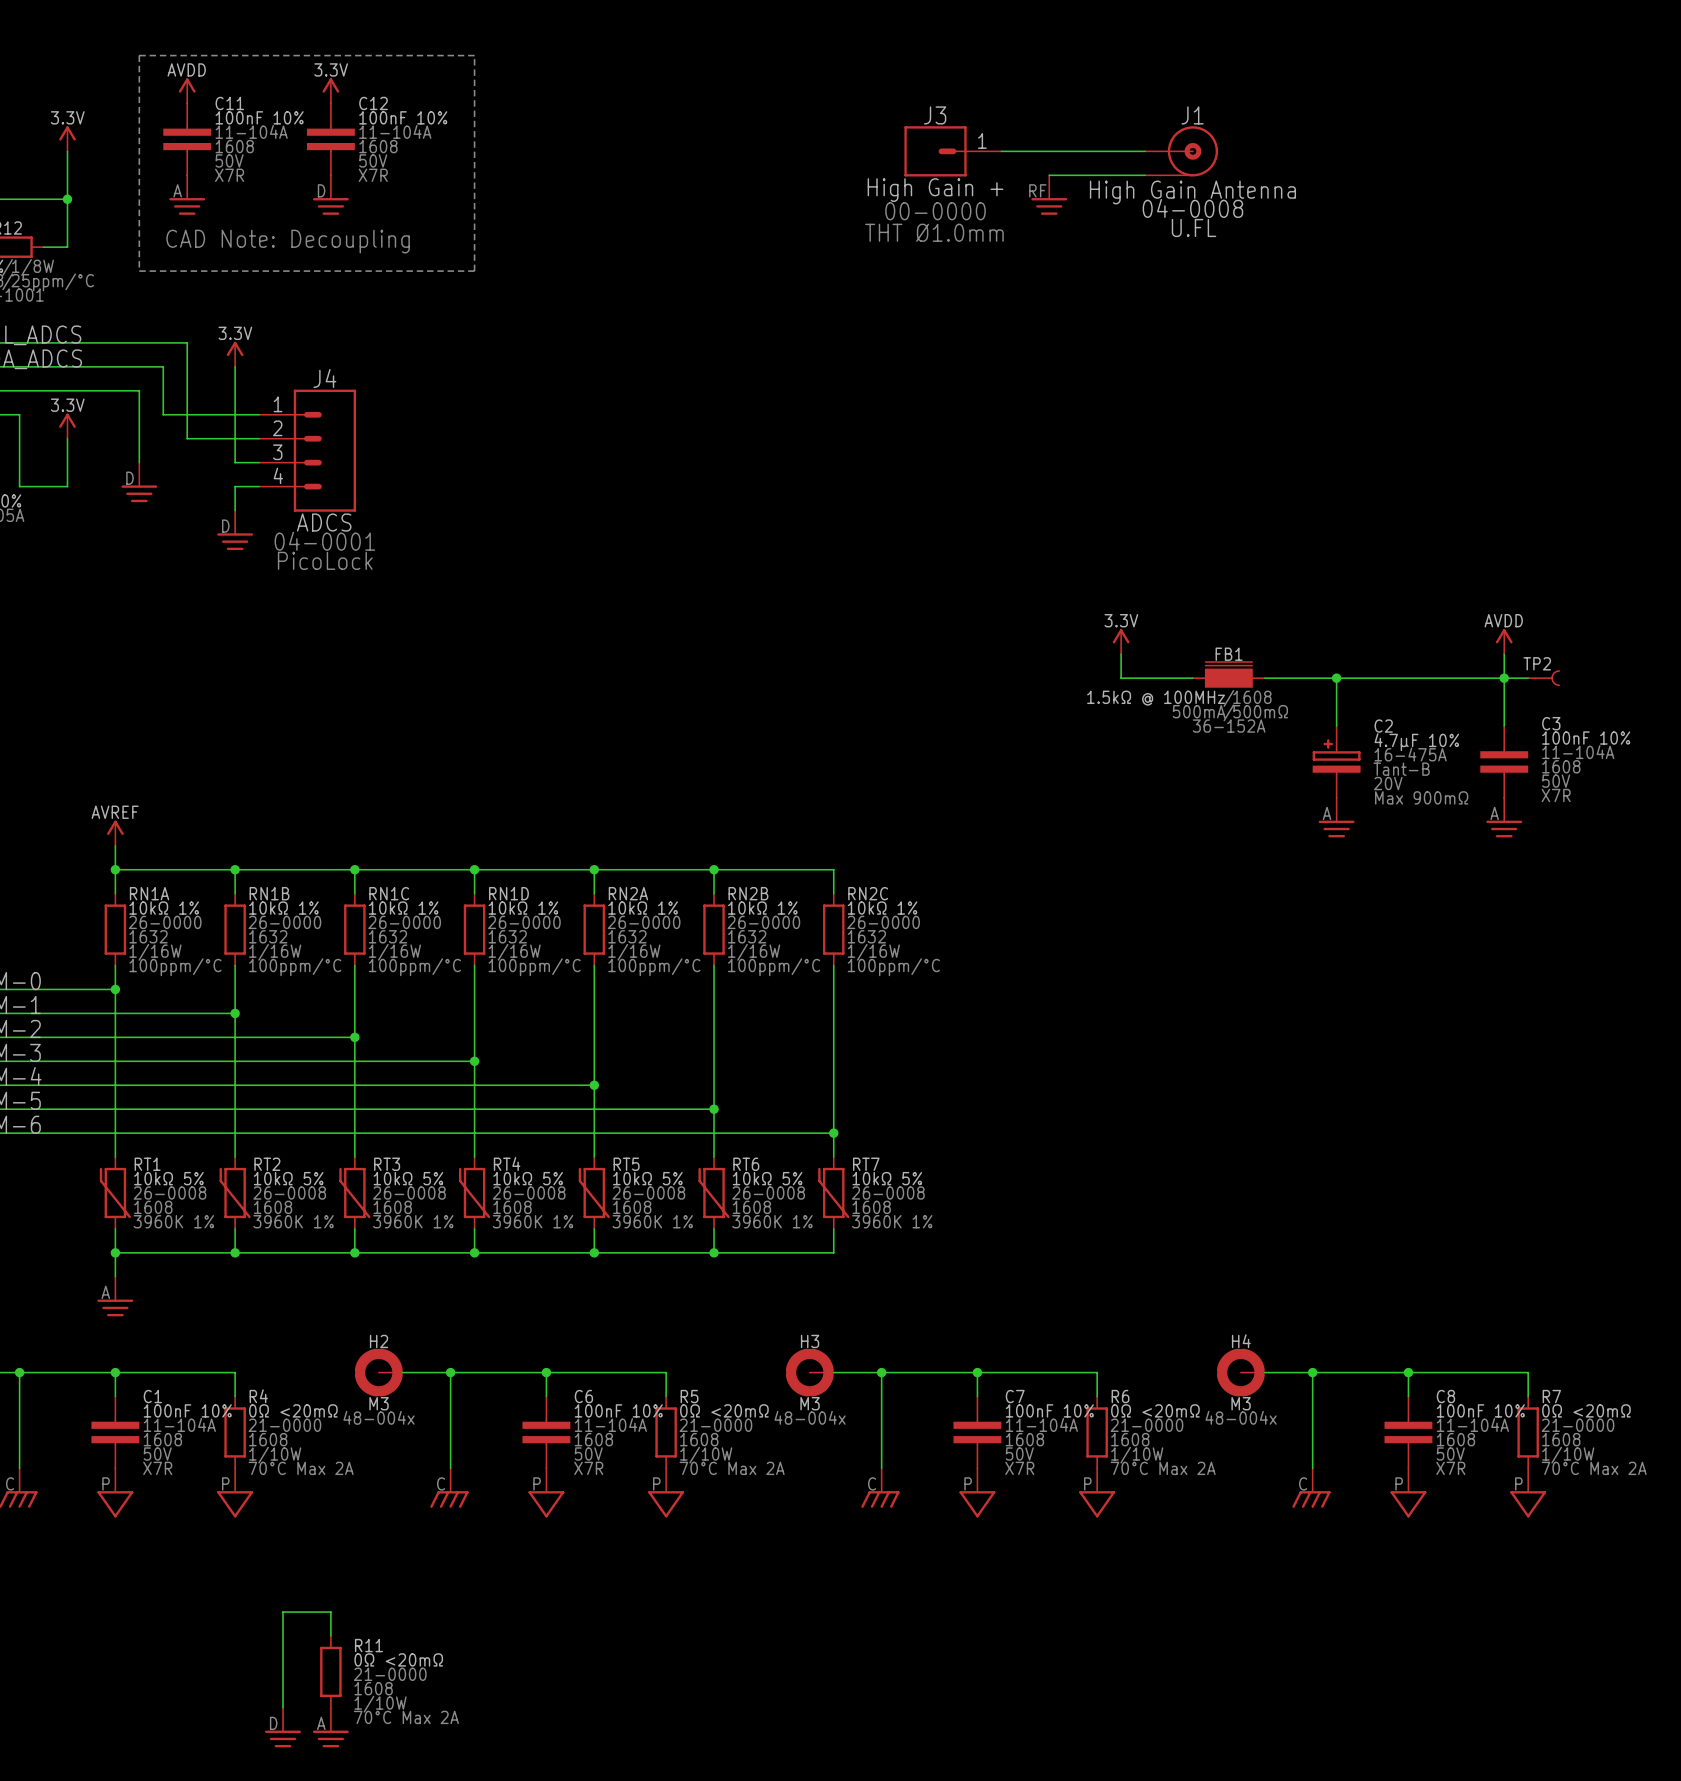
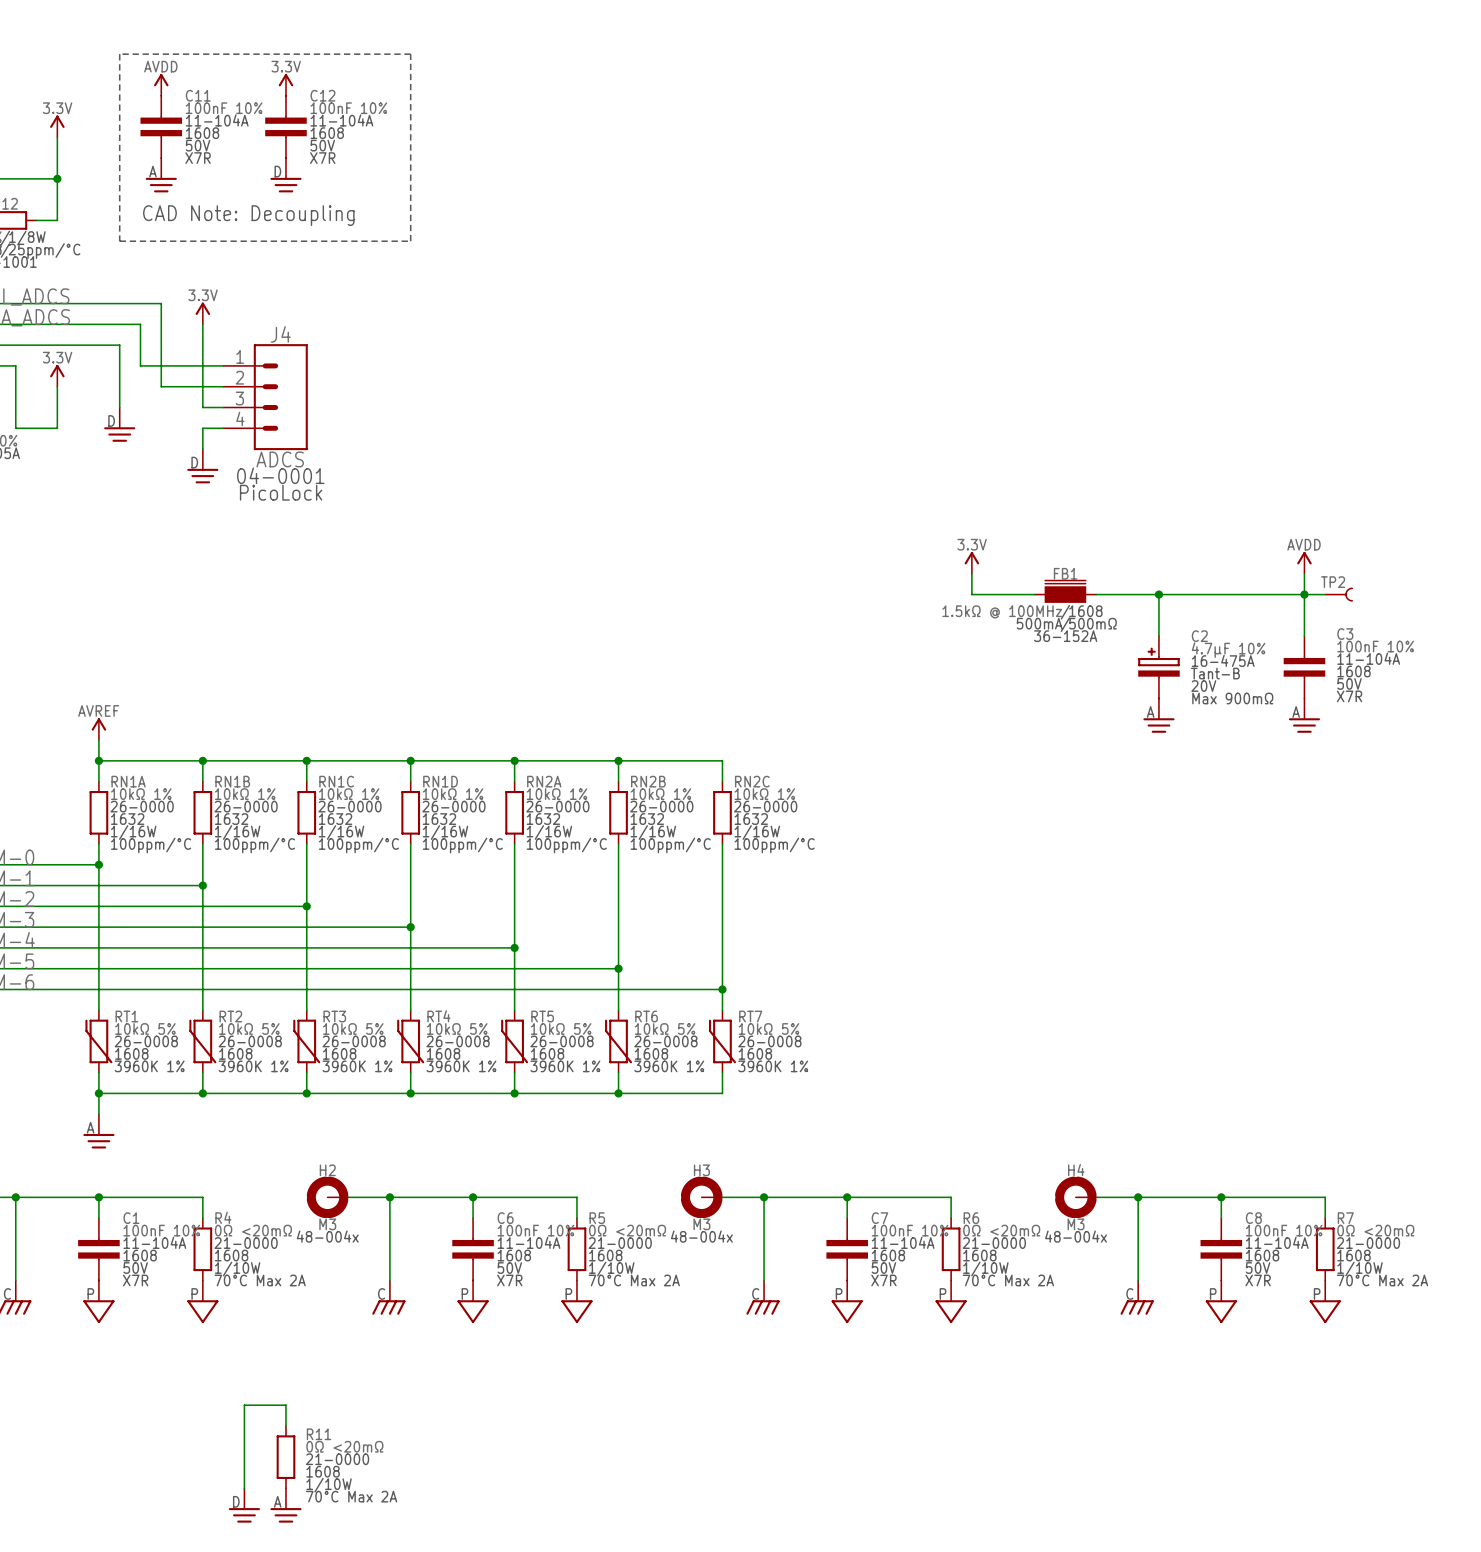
J3: High Gain + (952, 151) -> none
wire: (1001, 151) (1145, 151) -> none
J1: High Gain Antenna (1181, 151) -> none
wire: (1049, 175) (1145, 175) -> none
power symbol: (1049, 195) -> none

